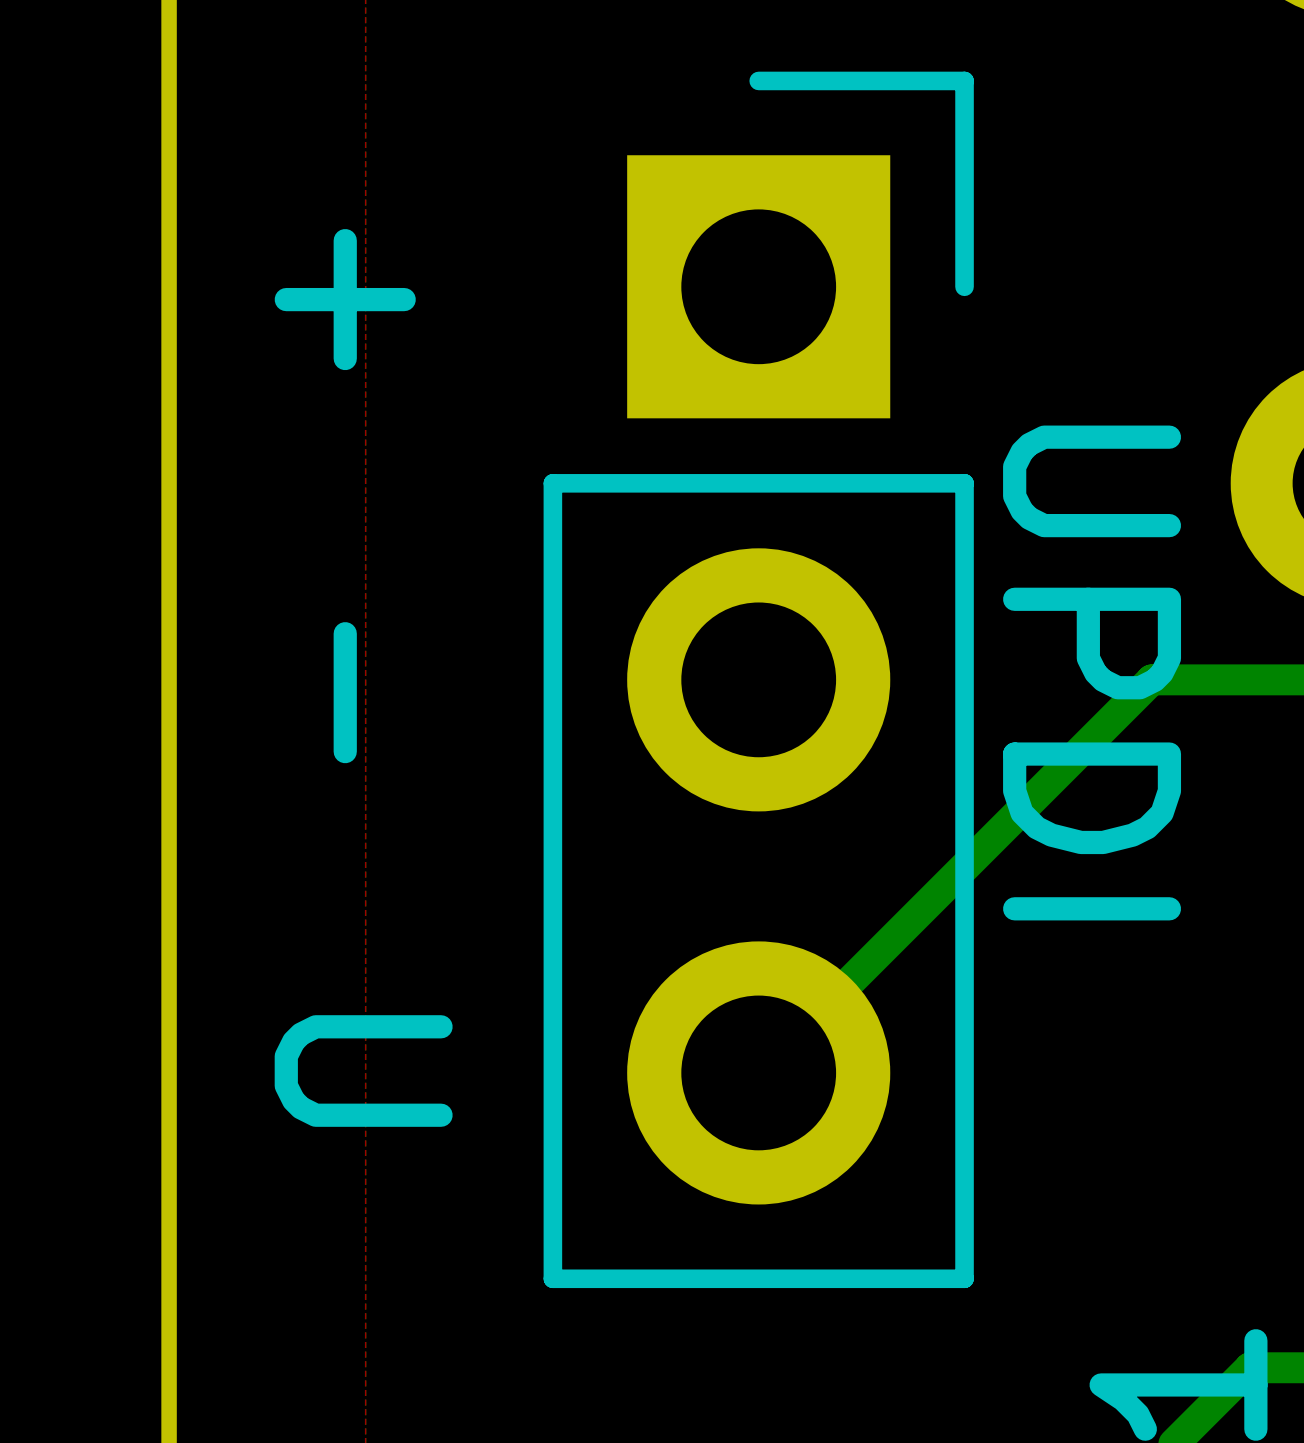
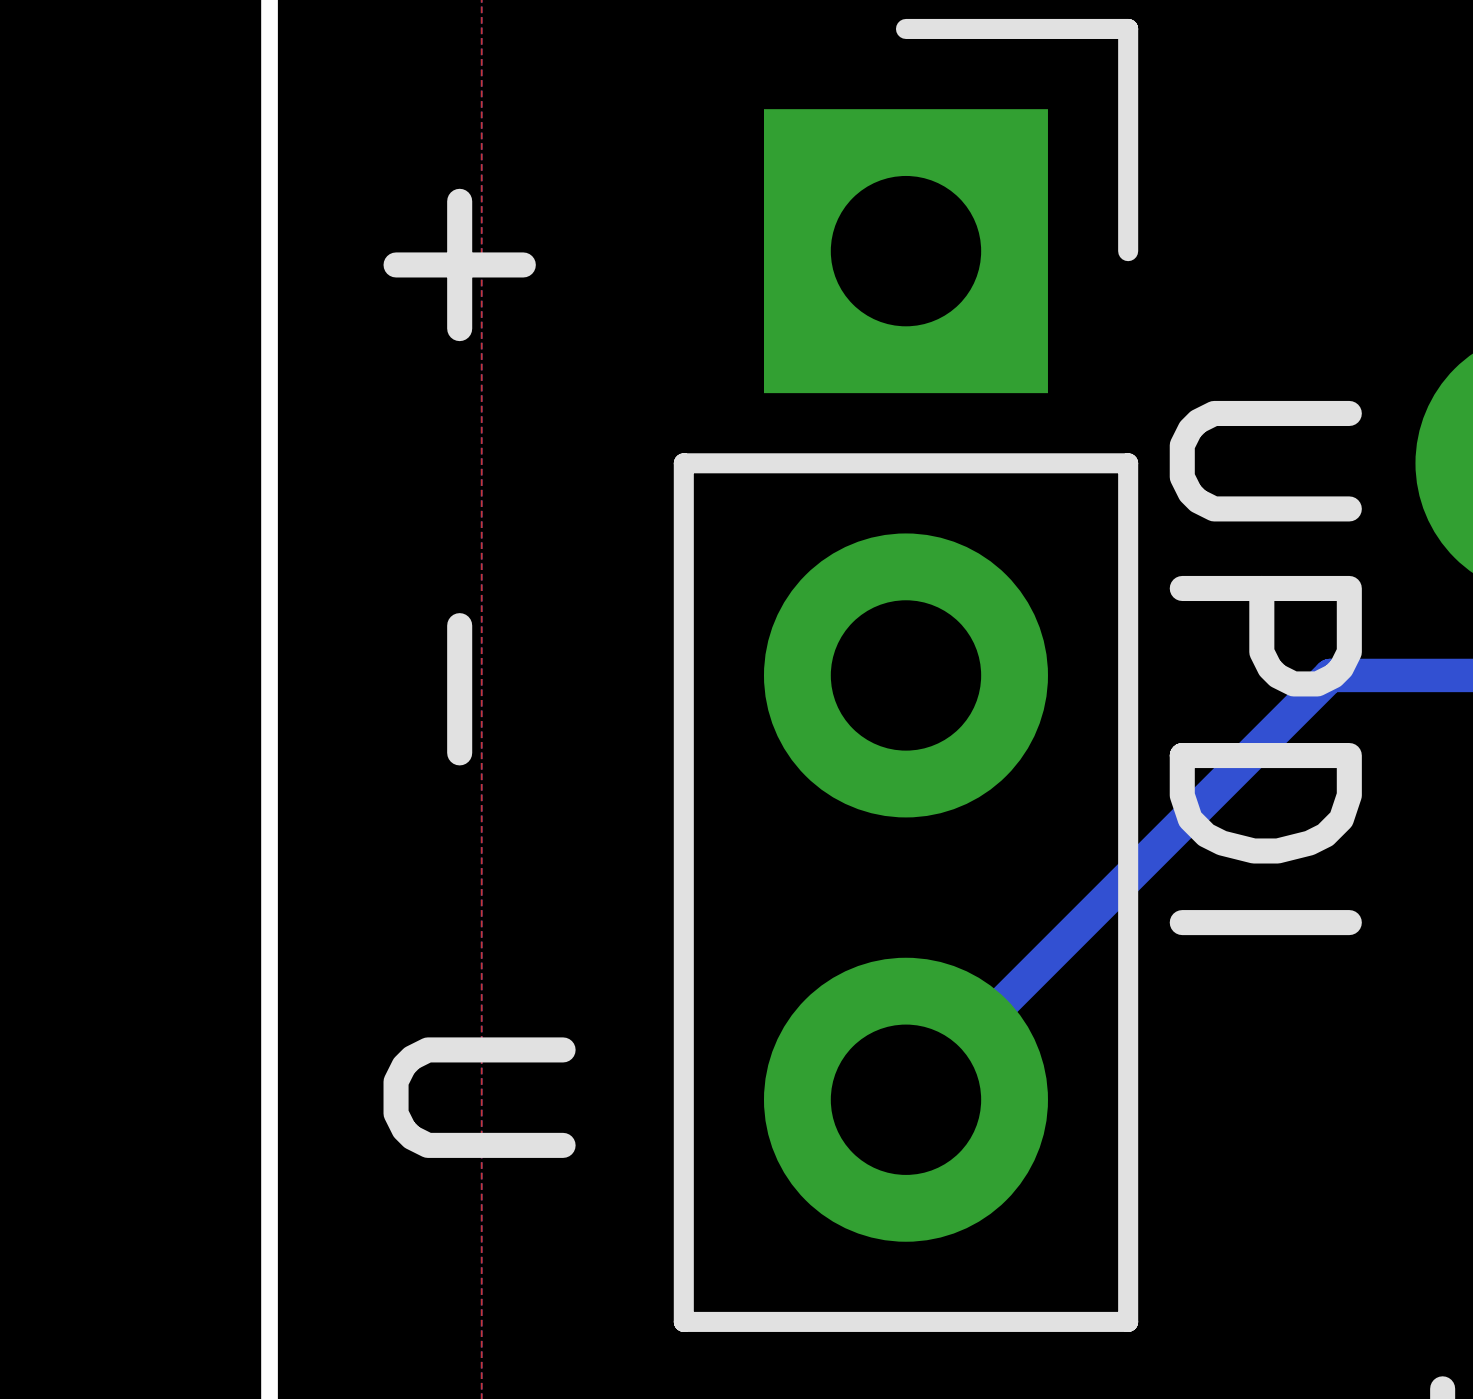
part footprint: [543, 71, 974, 1289] -> [673, 18, 1139, 1332]

